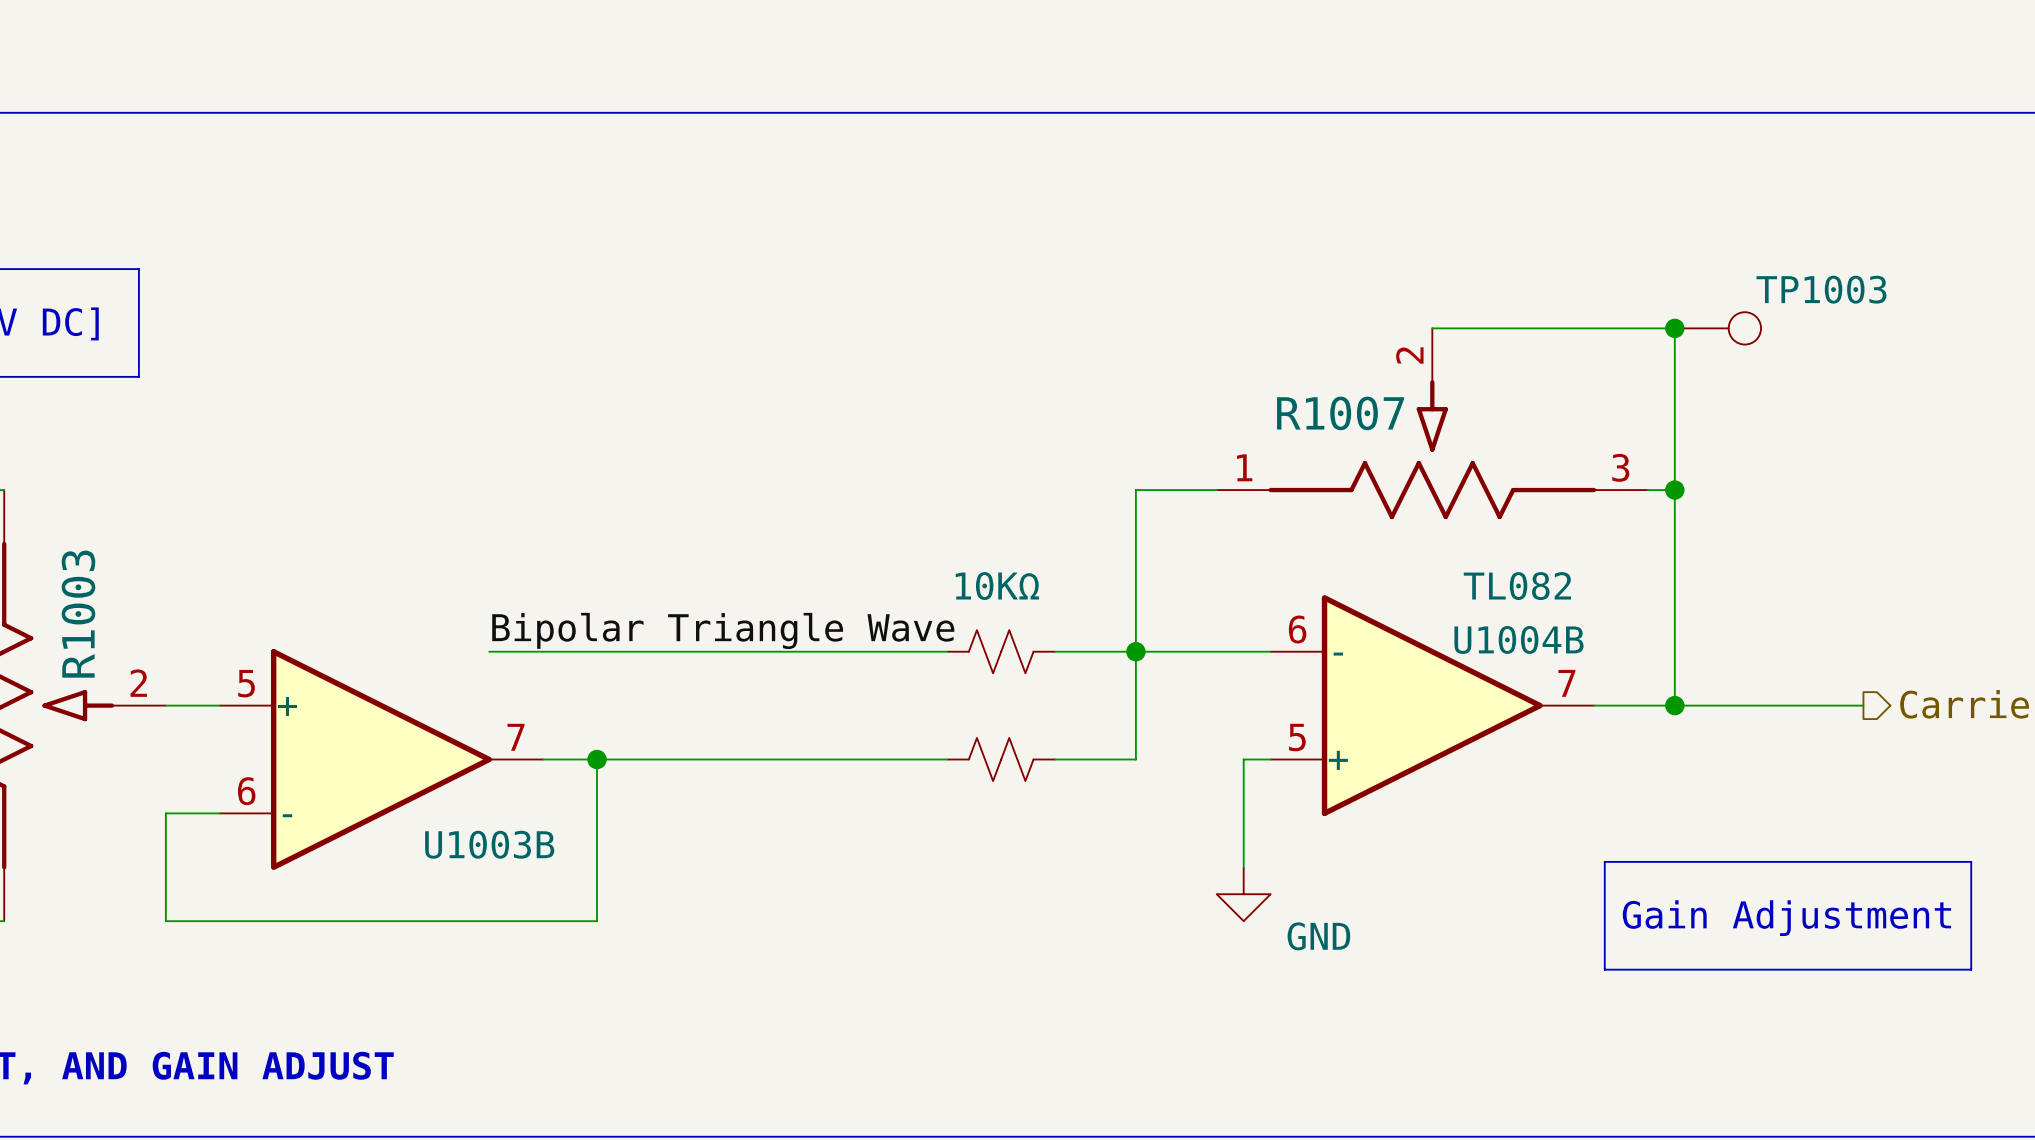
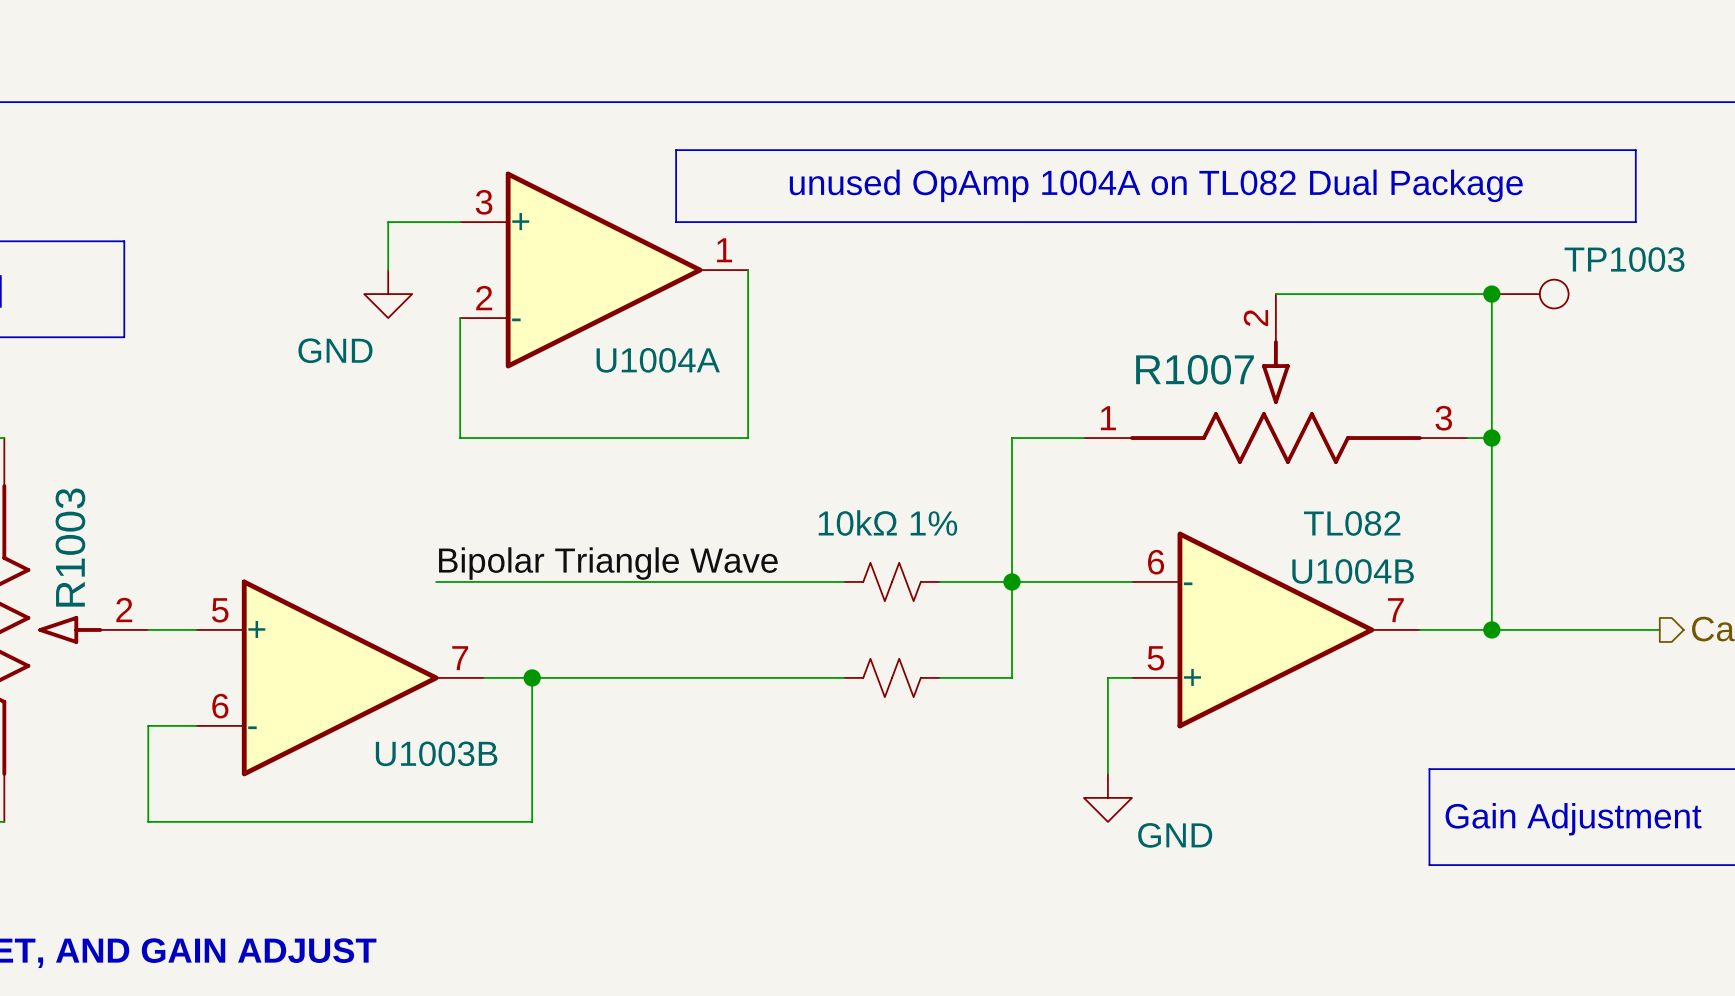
line: none -> (676, 150) (1635, 150) (1635, 222) (676, 222) (676, 150)
text: none -> unused OpAmp 1004A on TL082 Dual Package (1156, 185)
wire: none -> (460, 222) (388, 222) (388, 270)
U1004A: none -> (604, 270)
wire: none -> (748, 270) (748, 438) (460, 438) (460, 318)
power symbol: none -> GND (388, 294)
part value: 10KΩ (997, 586) -> 10kΩ 1% (887, 523)

